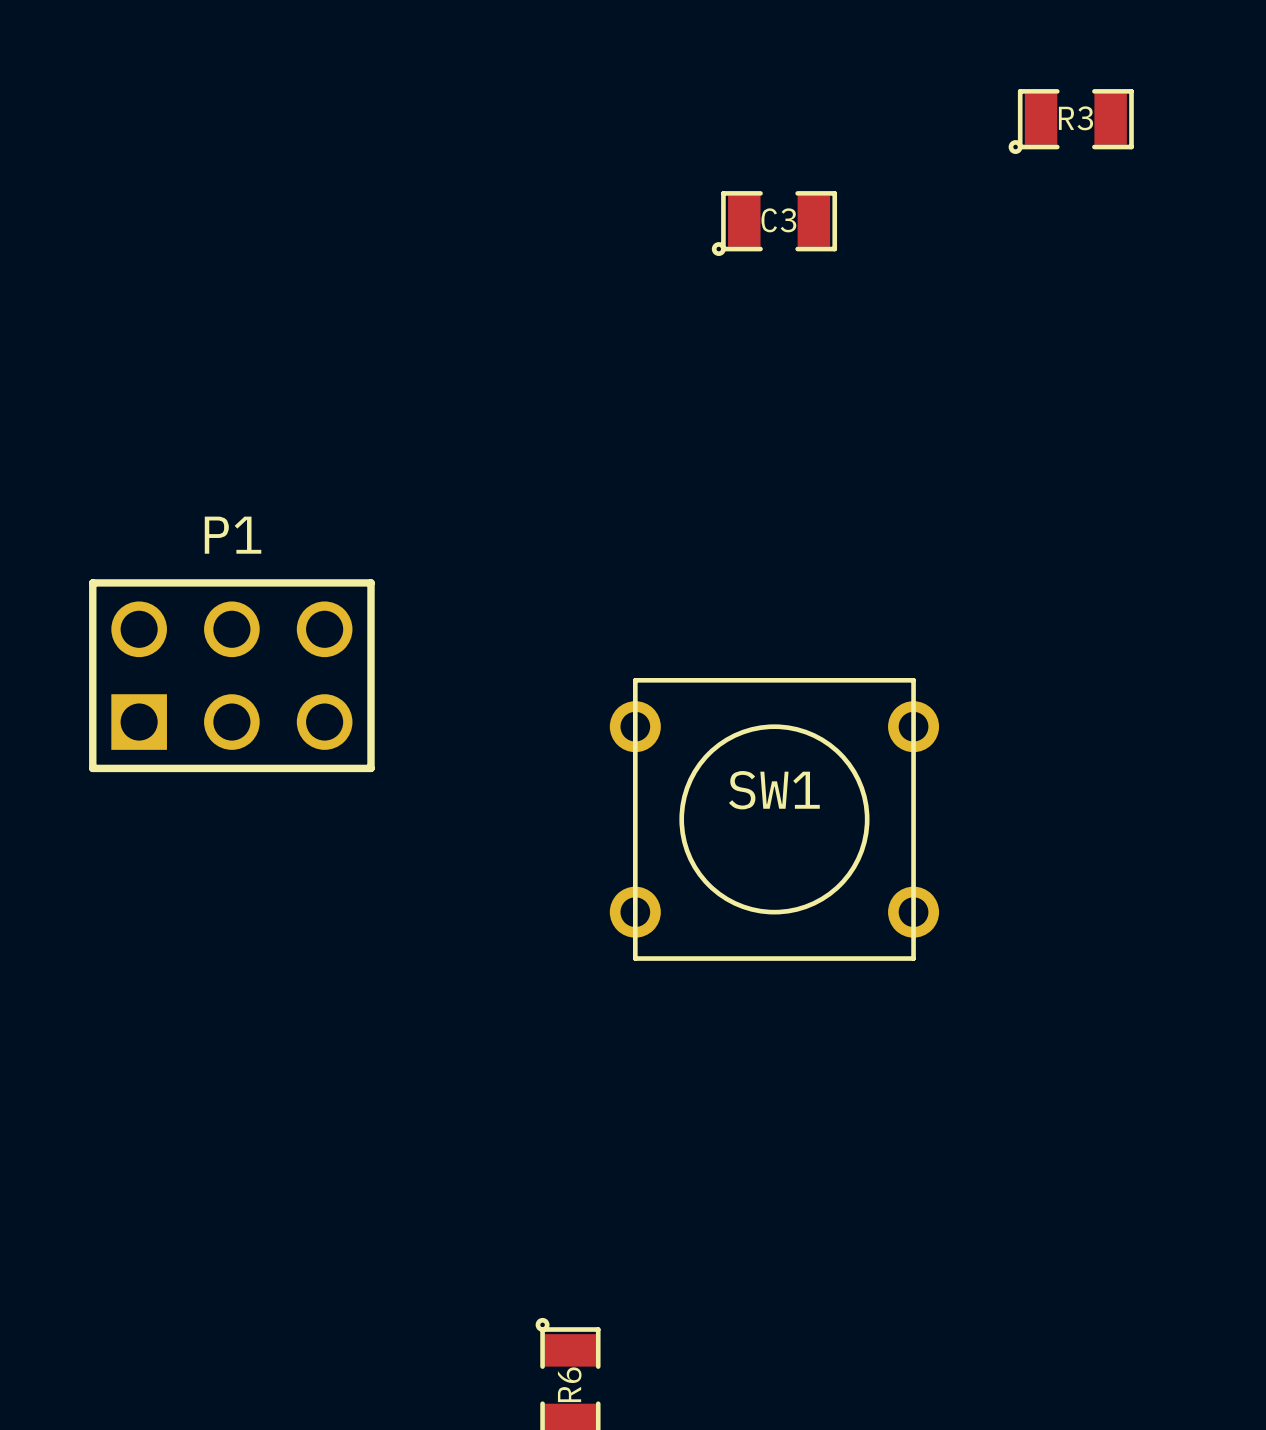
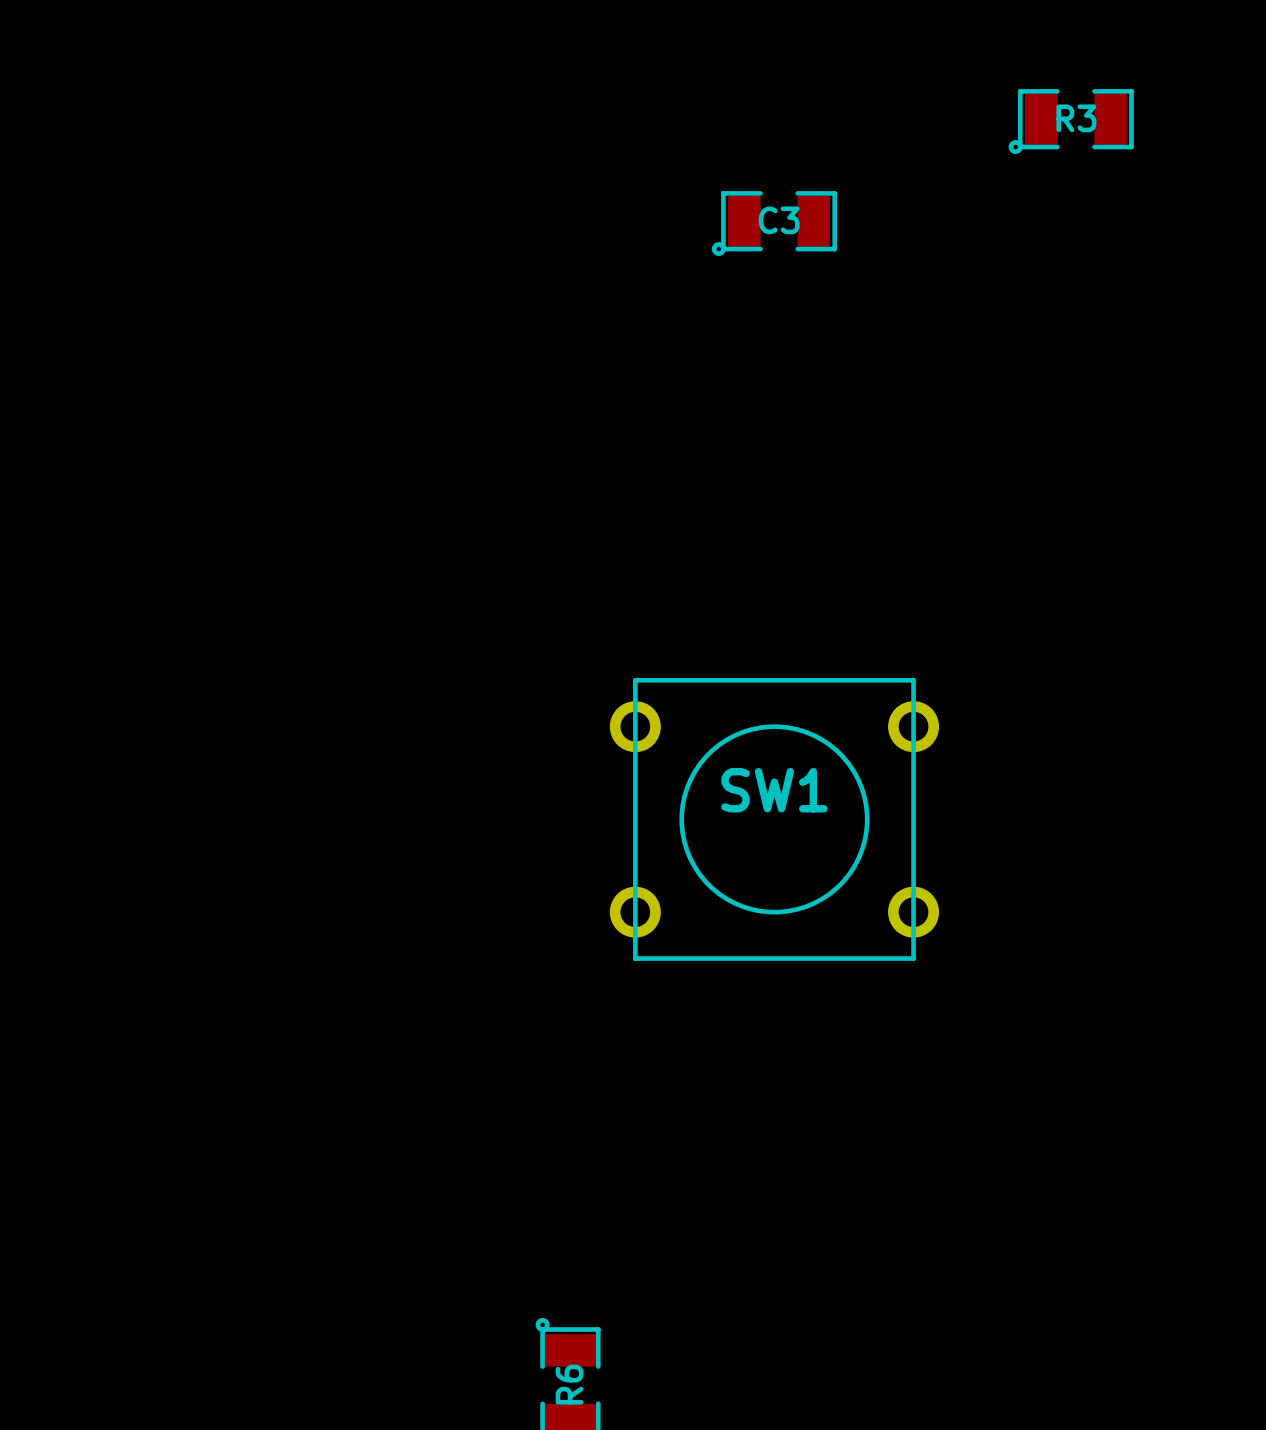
P1: (231, 675) -> none

